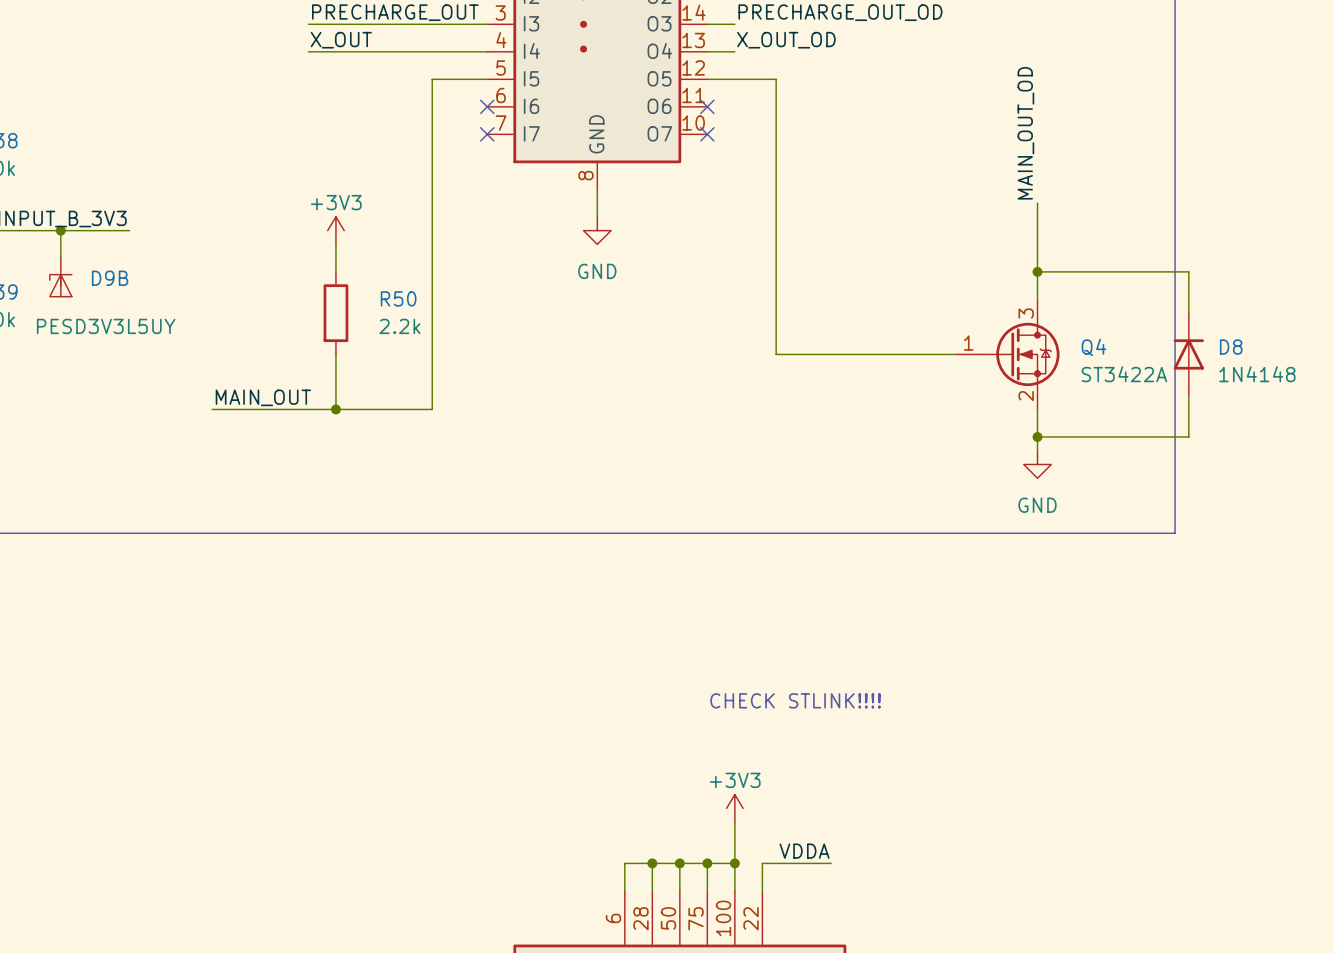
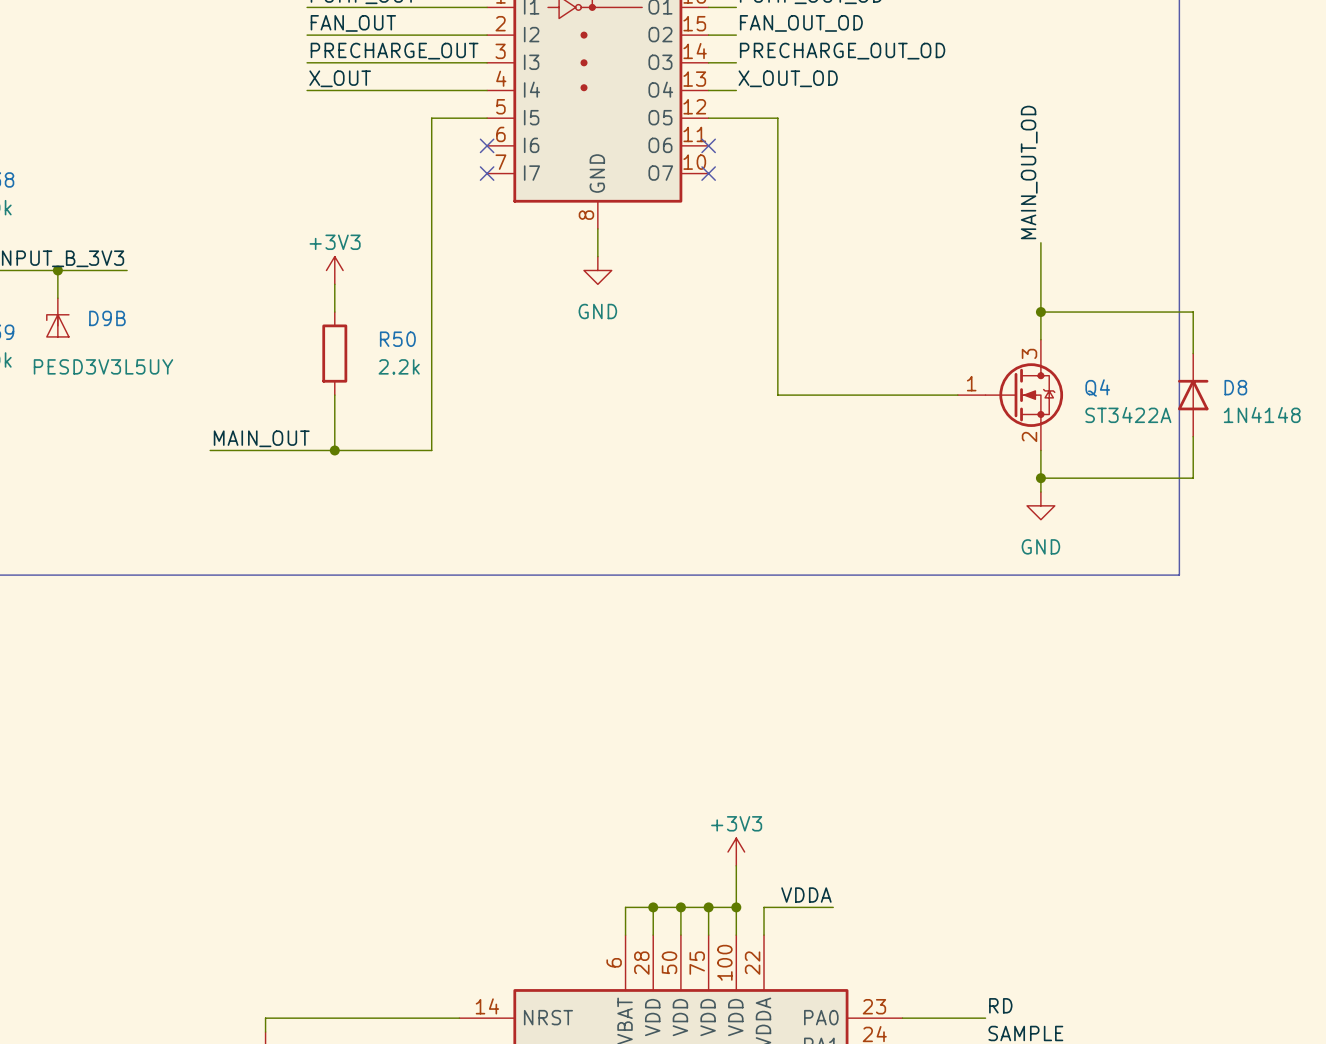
text: CHECK STLINK!!!! (795, 700) -> none

